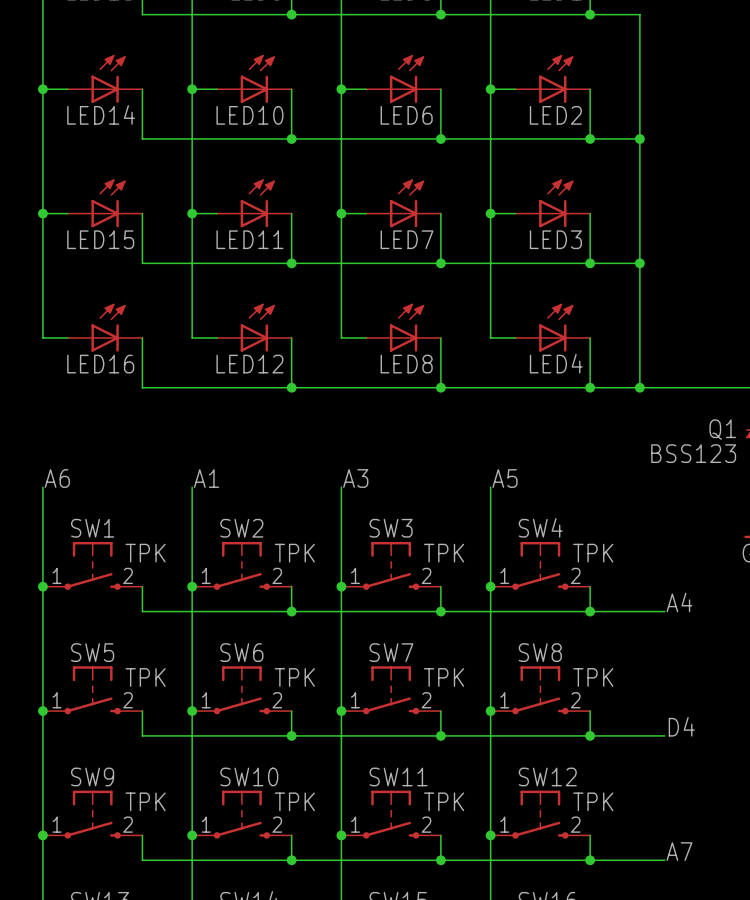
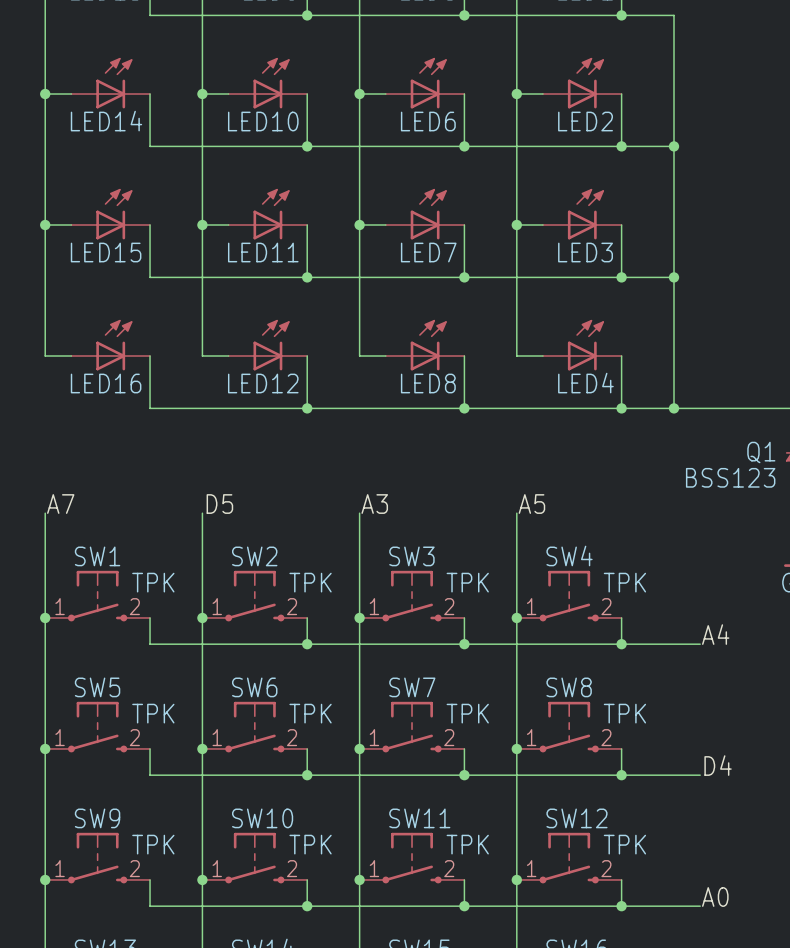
label: A6 (57, 478) -> A7 (60, 504)
label: A1 (206, 478) -> D5 (219, 504)
label: A7 (679, 851) -> A0 (715, 897)

